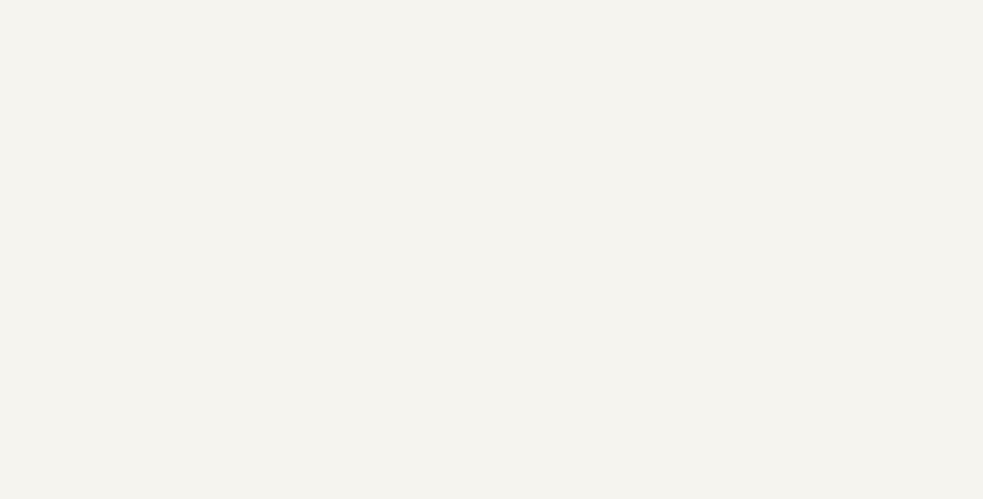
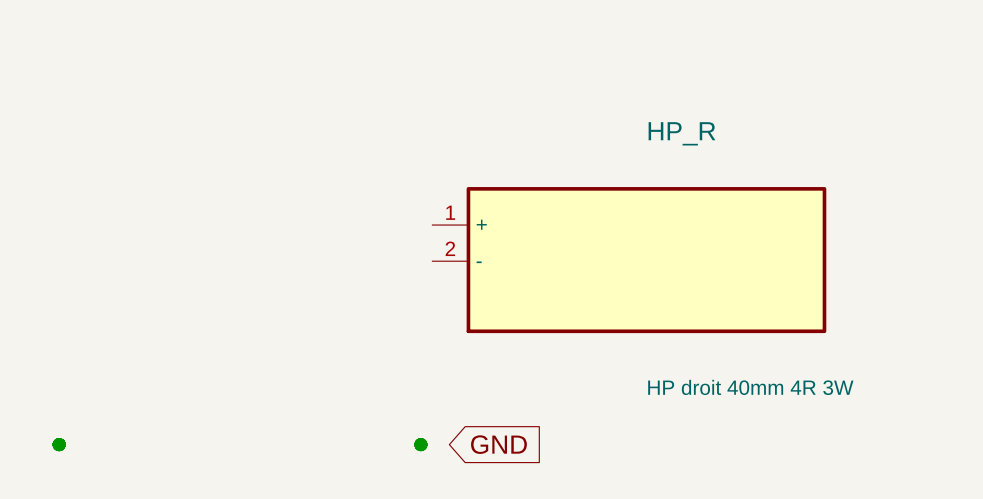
HP_R: none -> HP droit 40mm 4R 3W (629, 260)
junction: none -> (59, 444)
junction: none -> (420, 444)
global label: none -> GND (498, 444)

